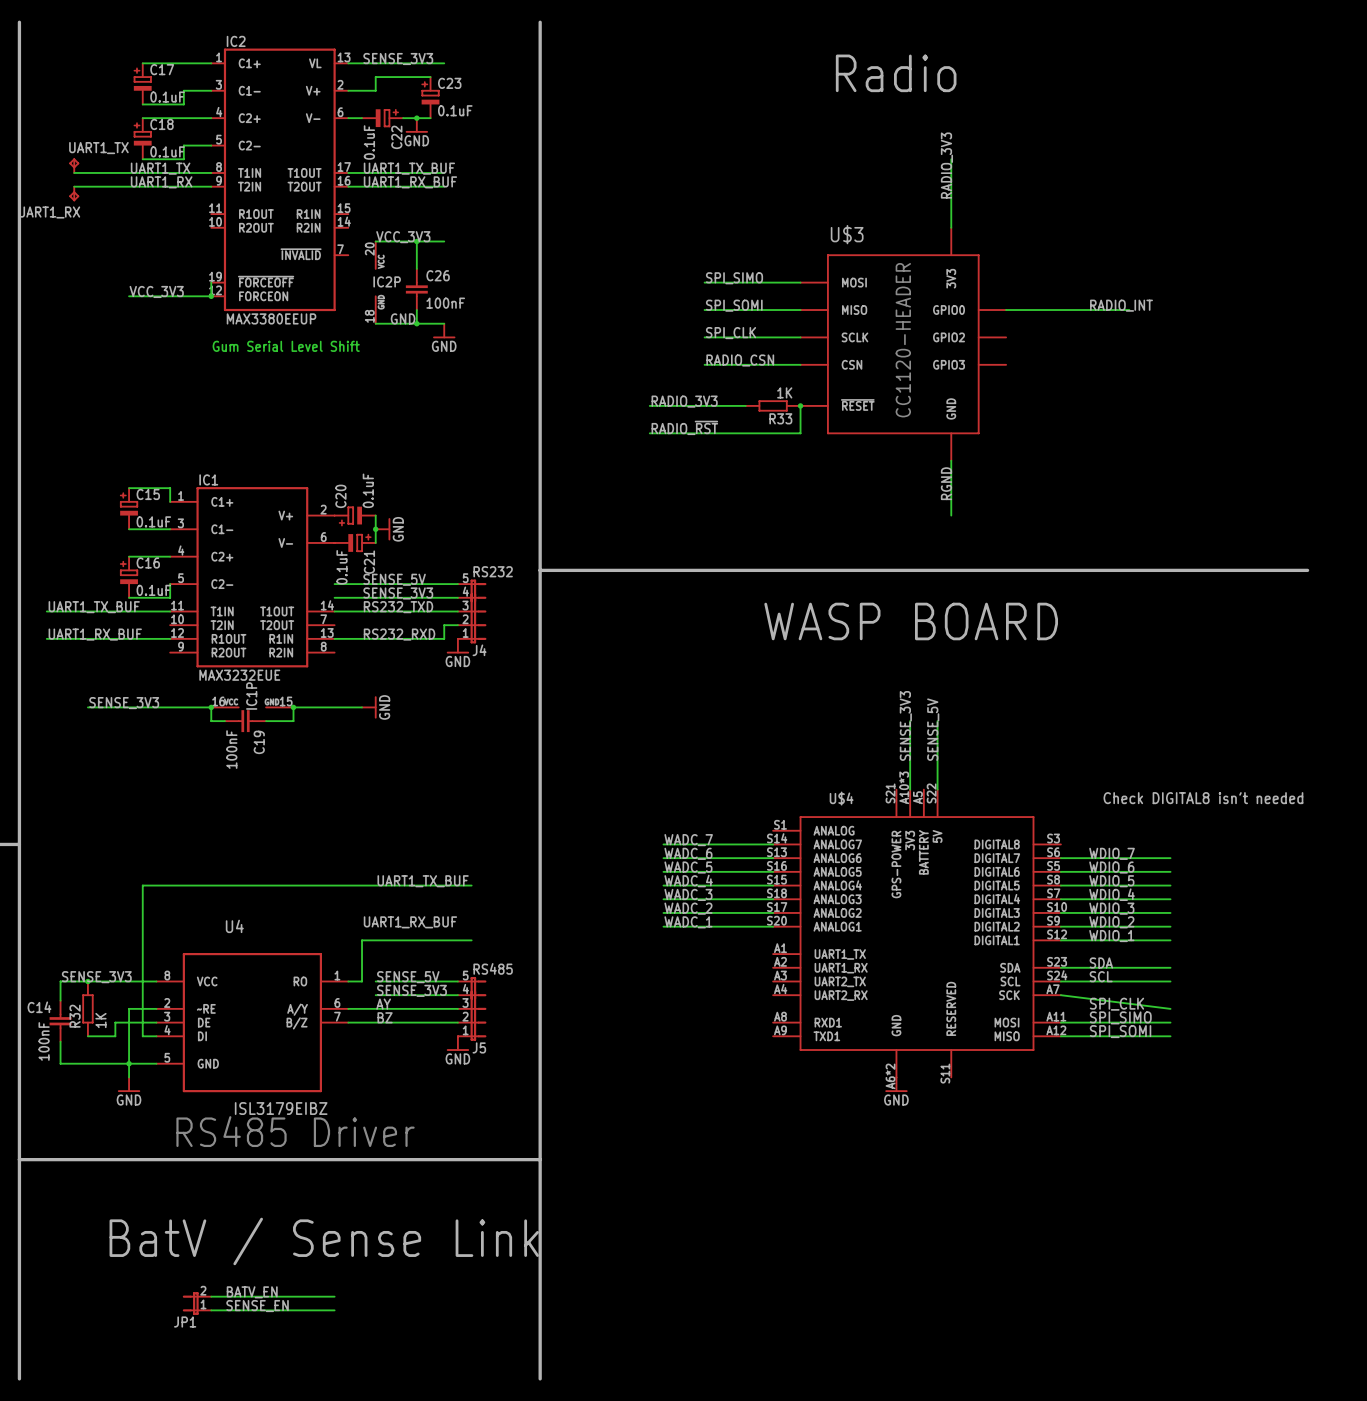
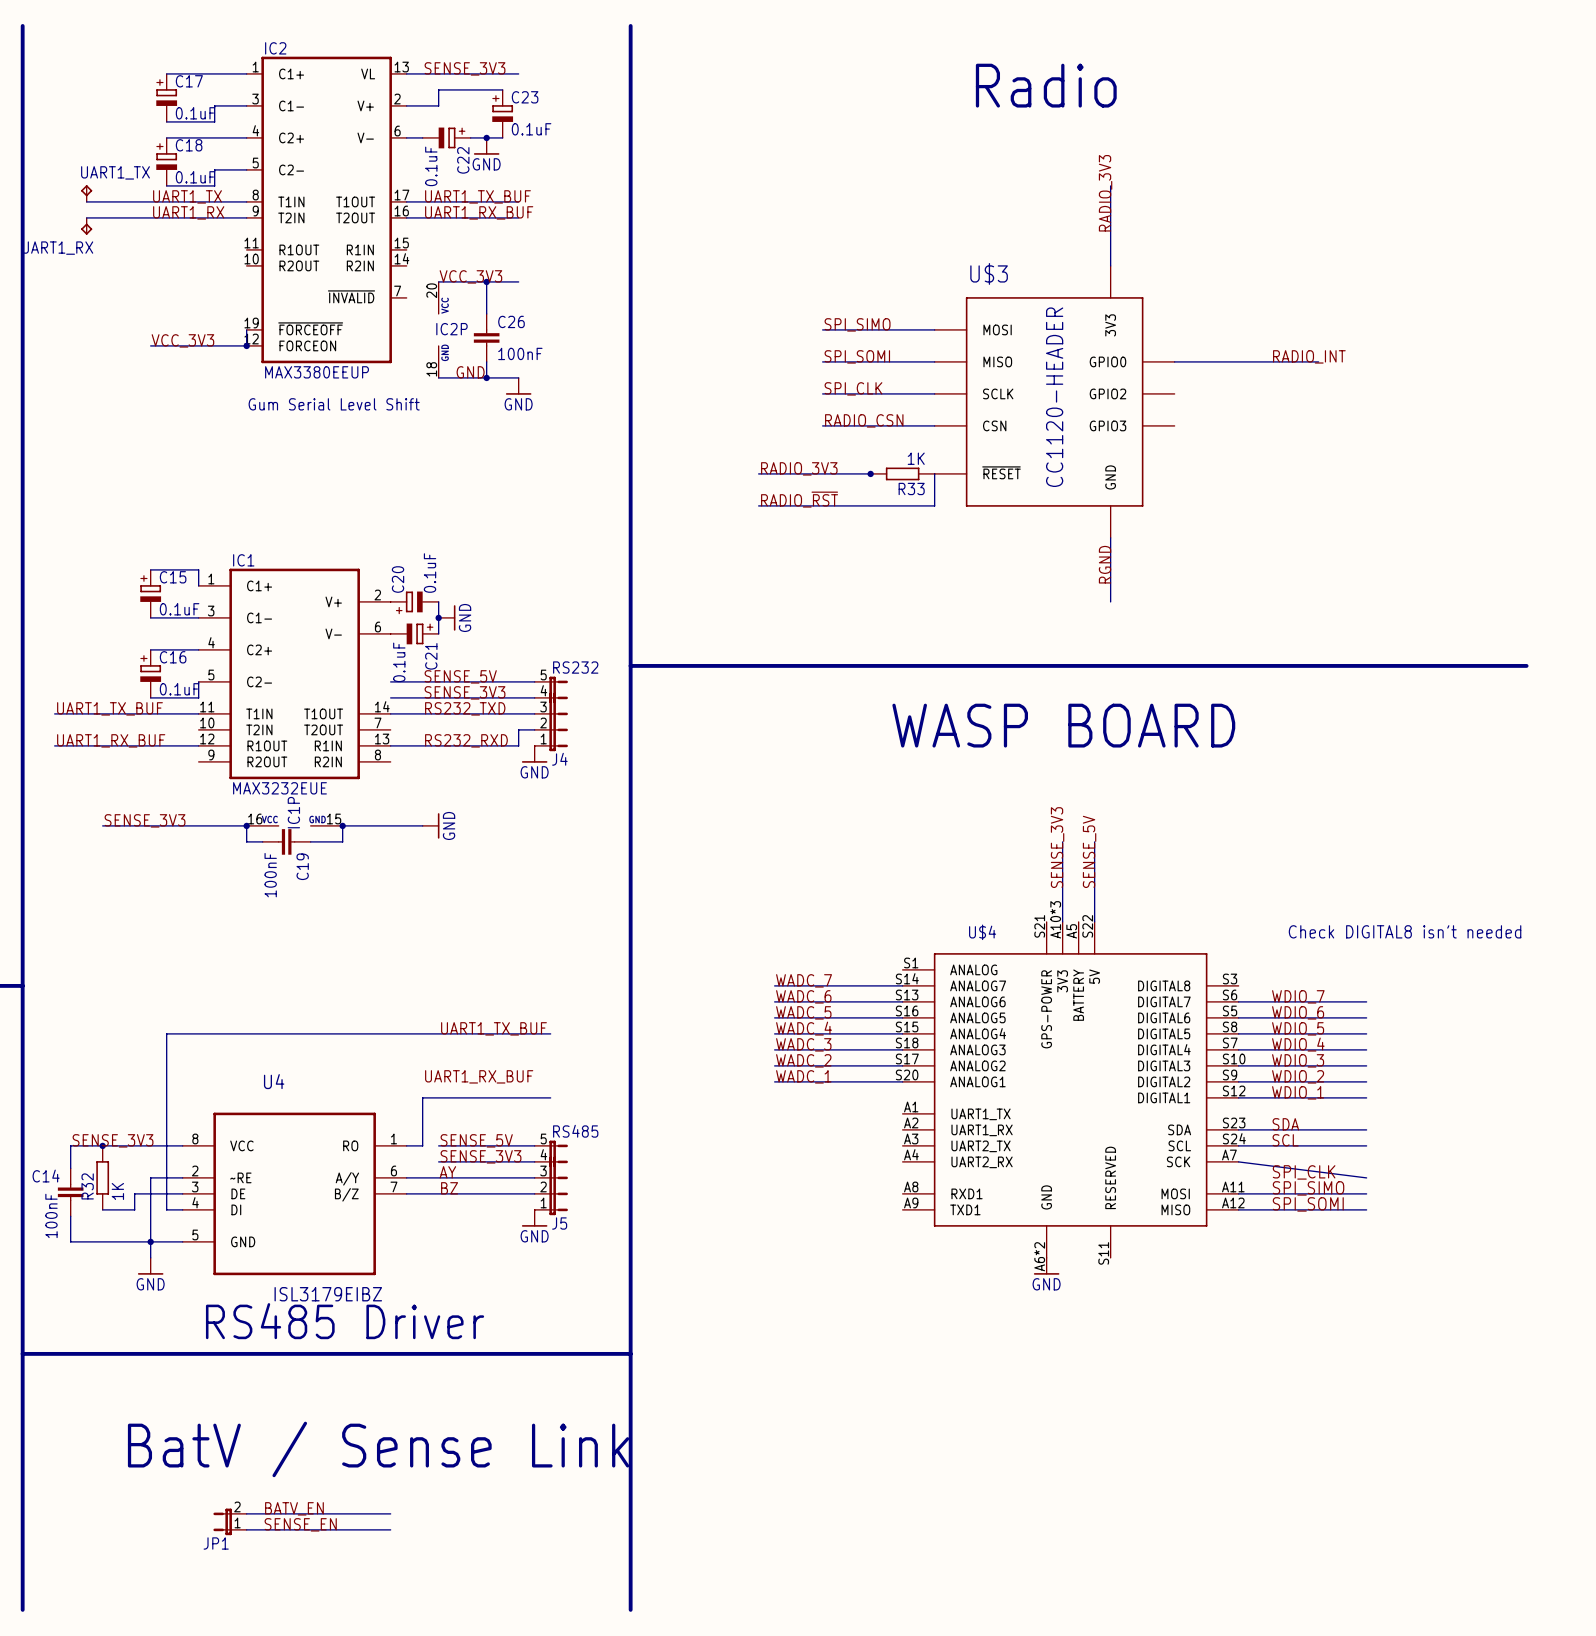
junction: none -> (870, 473)
junction: (800, 405) -> none

